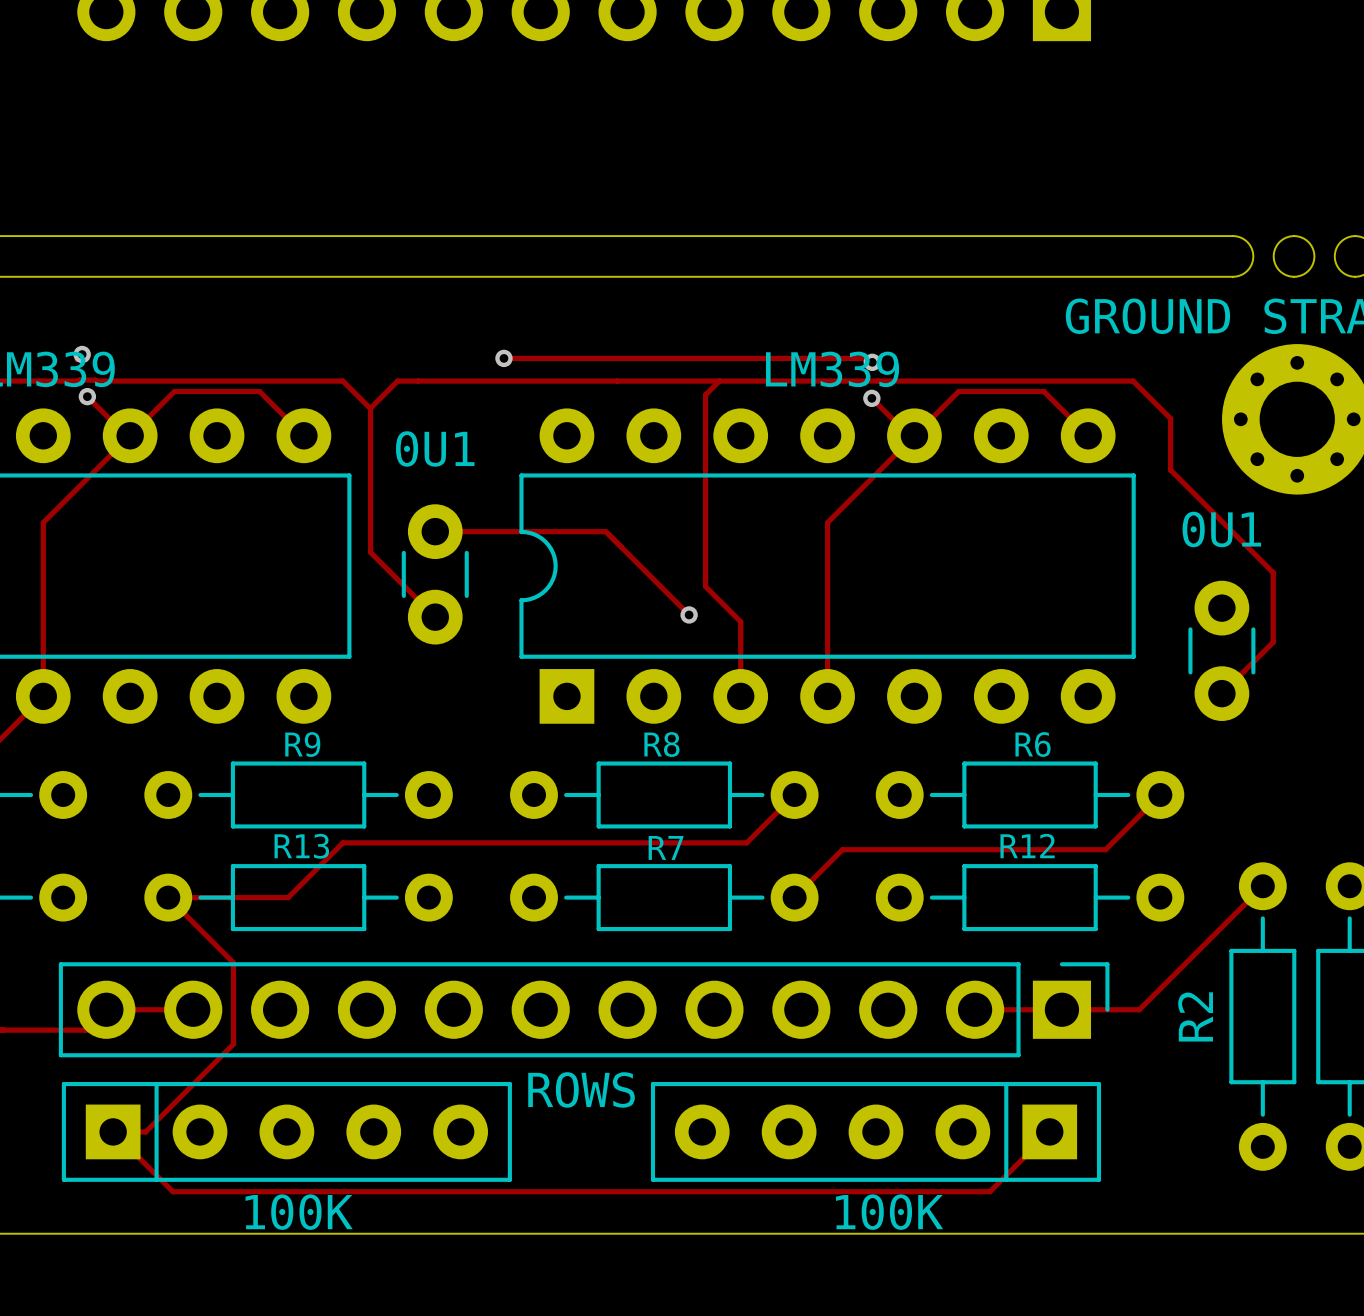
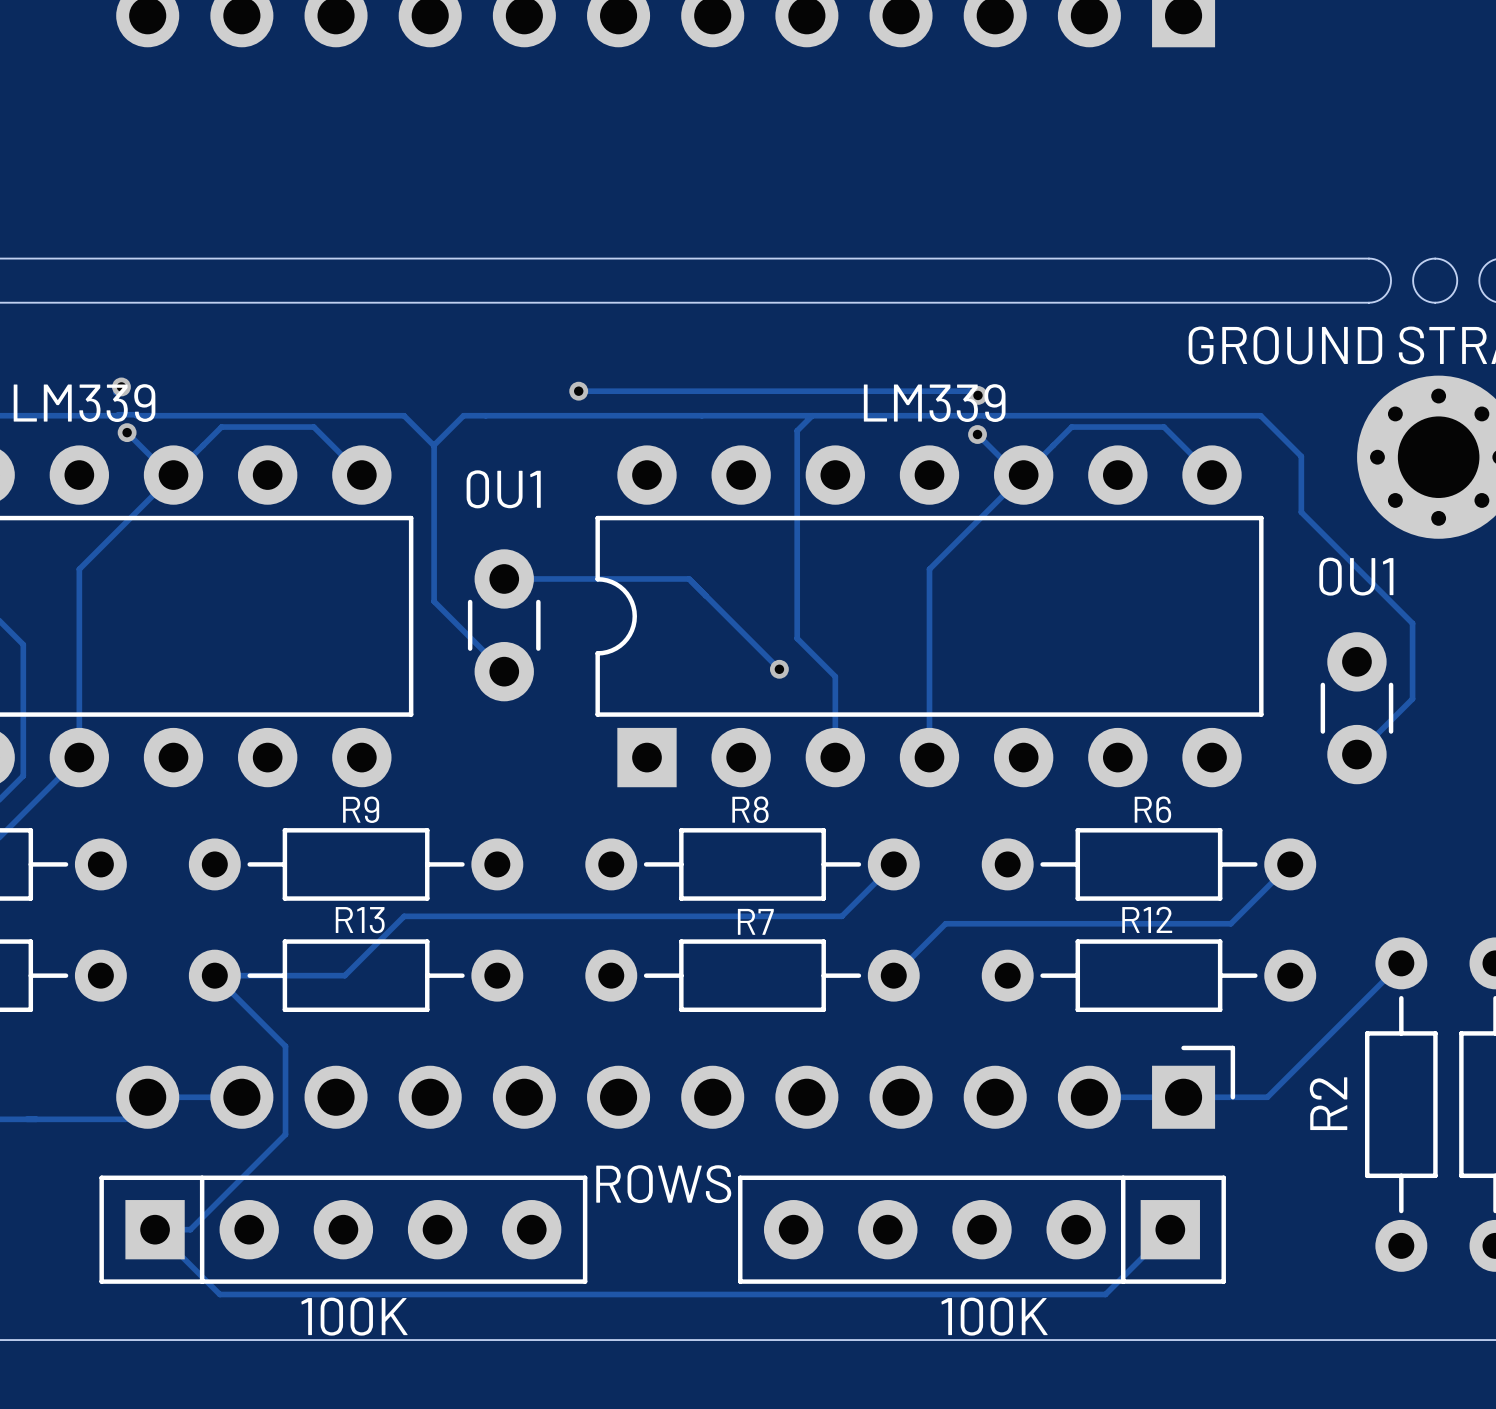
part footprint: [58, 962, 1110, 1058] -> [116, 1045, 1236, 1129]

